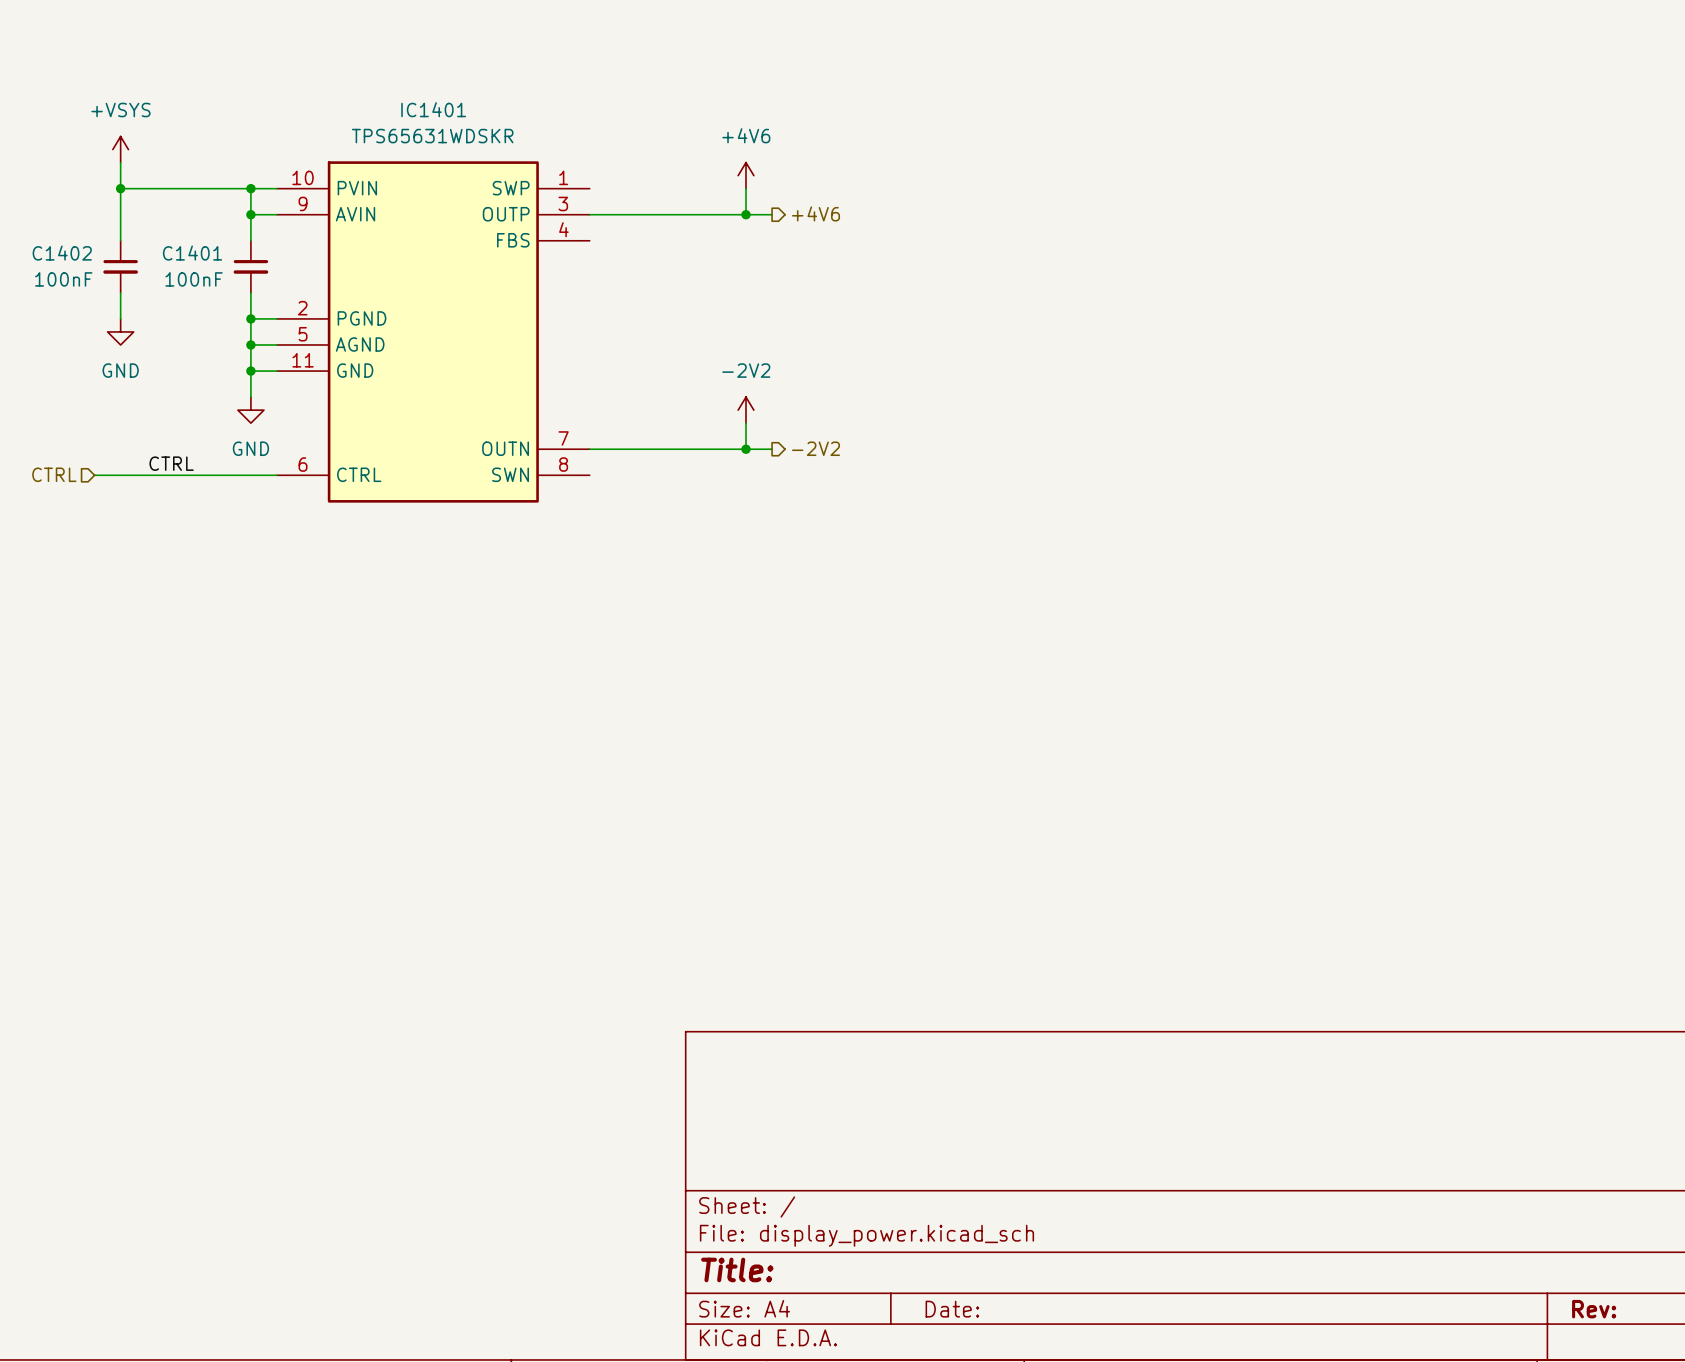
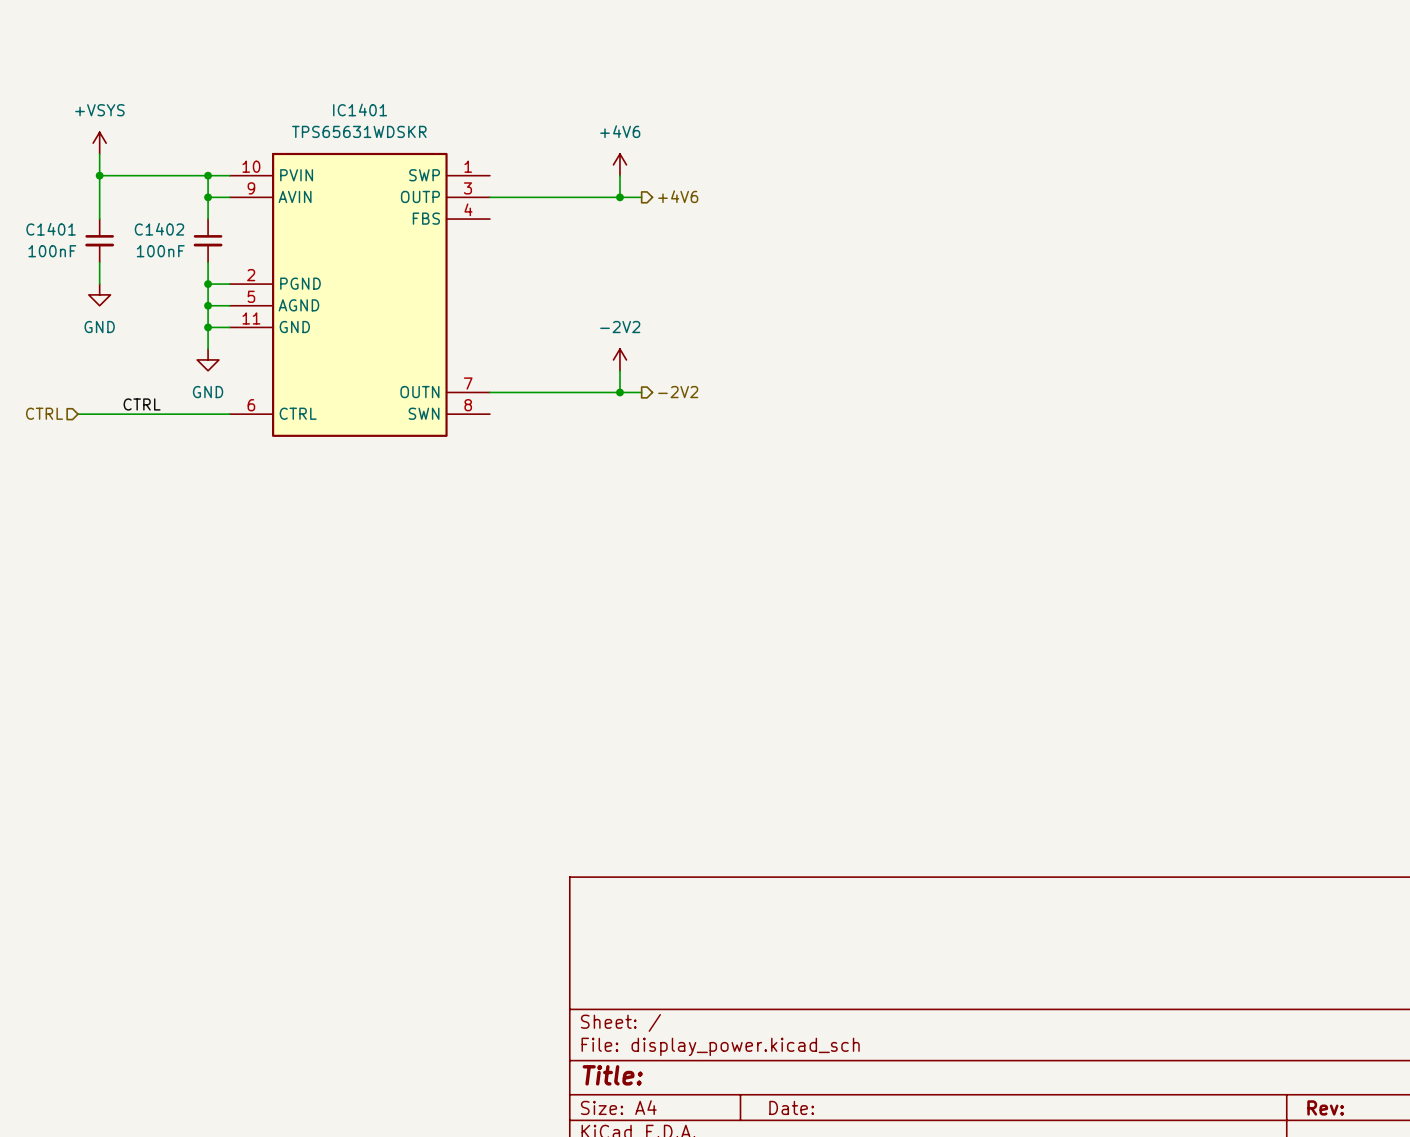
C1402 name: C1402 (62, 253) -> C1401 (51, 229)
C1401 name: C1401 (192, 253) -> C1402 (159, 229)

